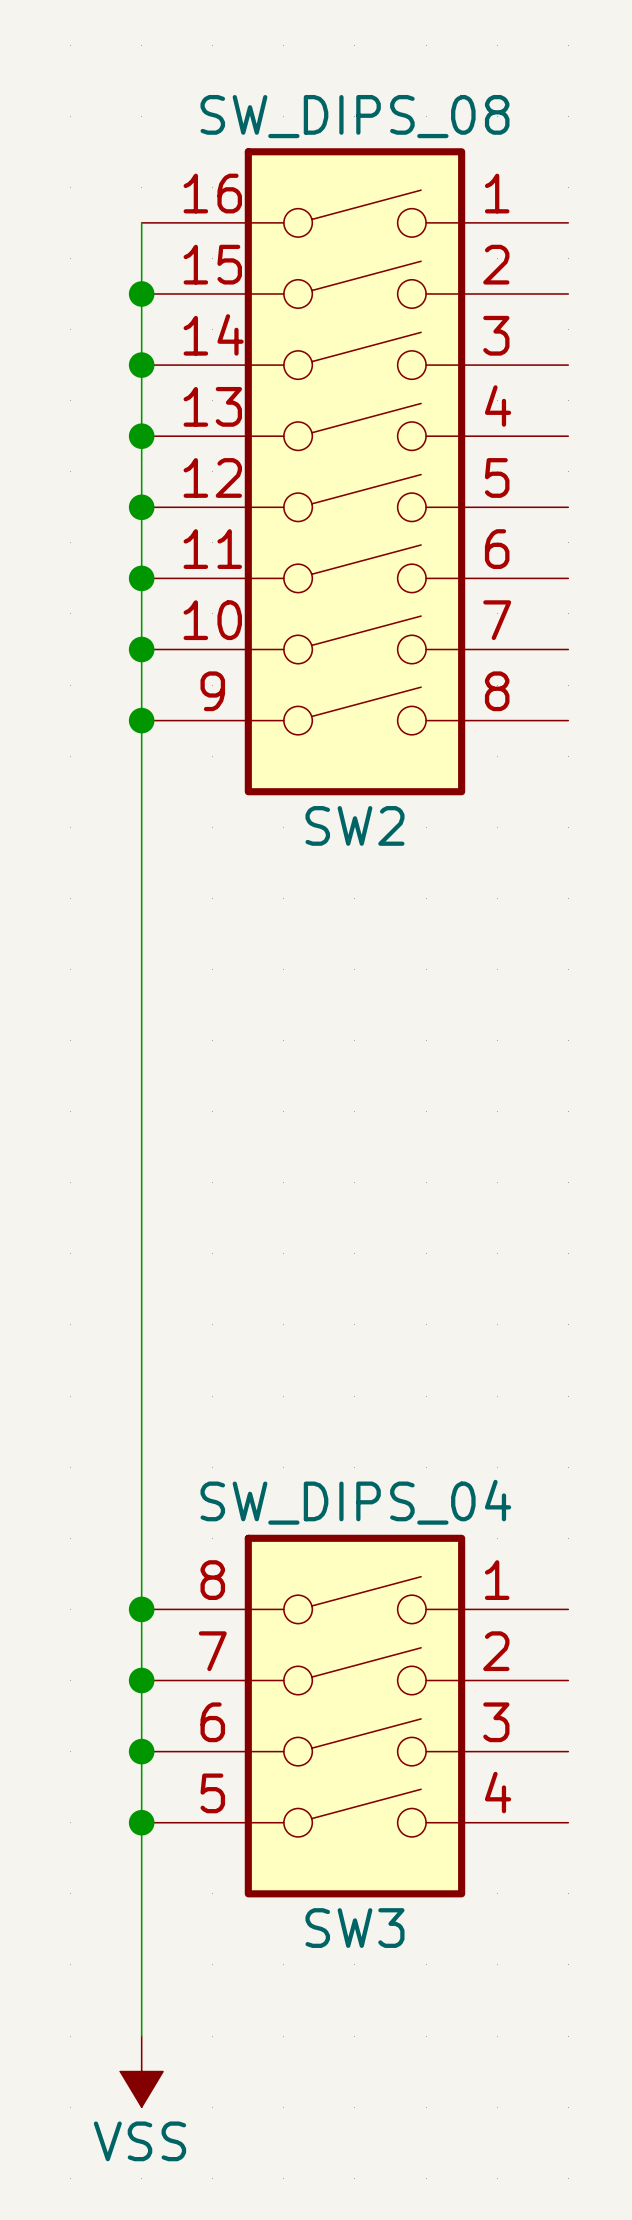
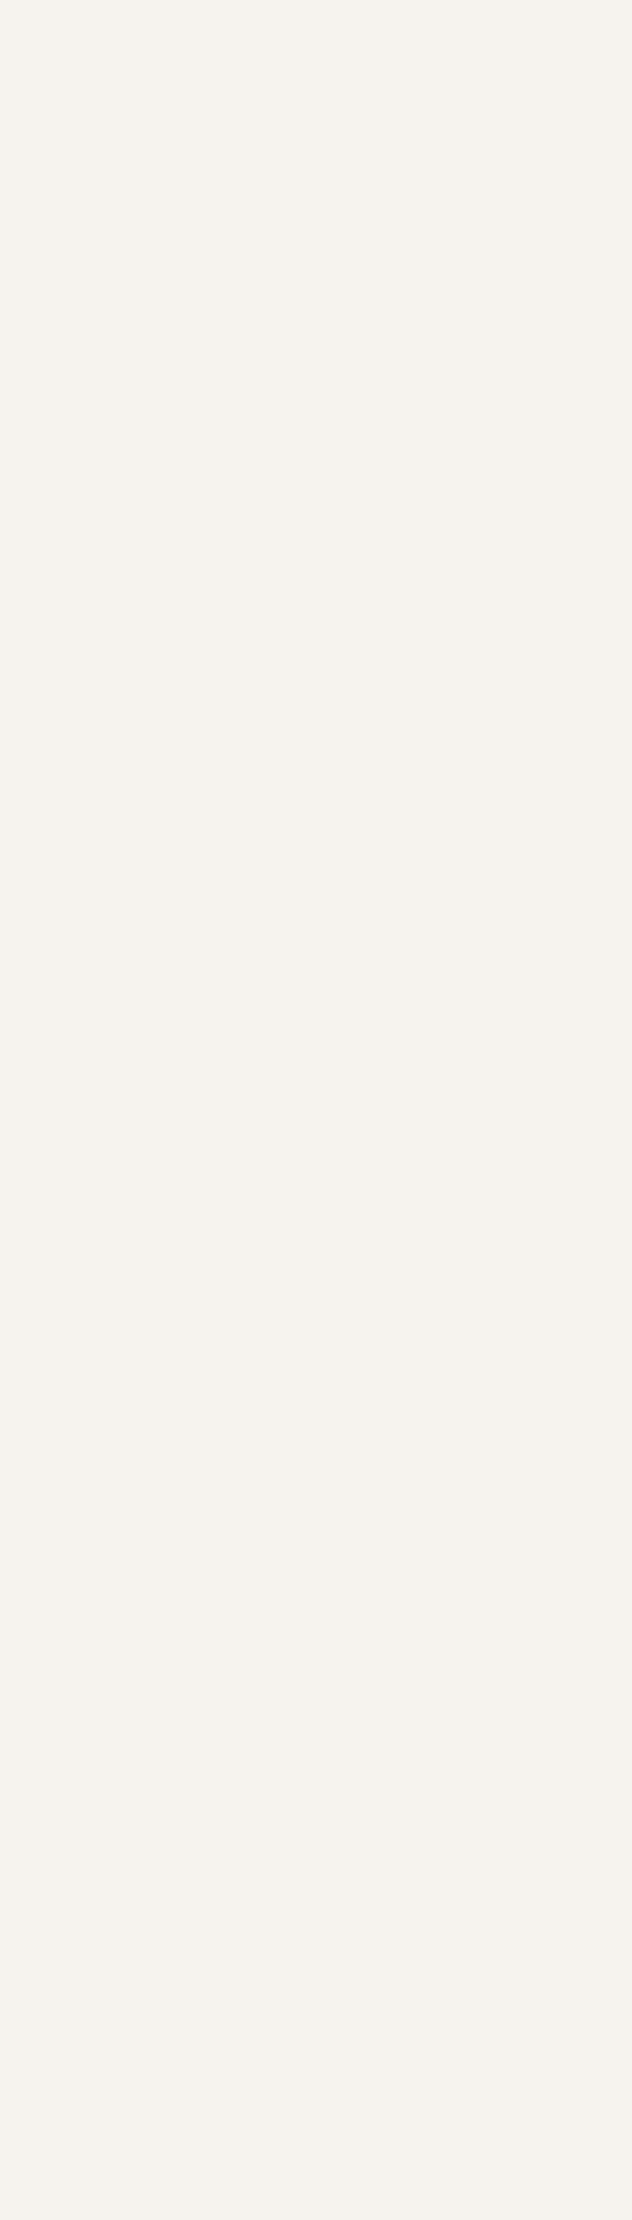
wire: (141, 222) (141, 2036) -> none
junction: (141, 293) -> none
junction: (141, 365) -> none
junction: (141, 436) -> none
SW2: SW_DIPS_08 (354, 471) -> none
junction: (141, 507) -> none
junction: (141, 578) -> none
junction: (141, 649) -> none
junction: (141, 720) -> none
junction: (141, 1609) -> none
junction: (141, 1680) -> none
SW3: SW_DIPS_04 (354, 1716) -> none
junction: (141, 1751) -> none
junction: (141, 1822) -> none
power symbol: VSS (141, 2071) -> none

